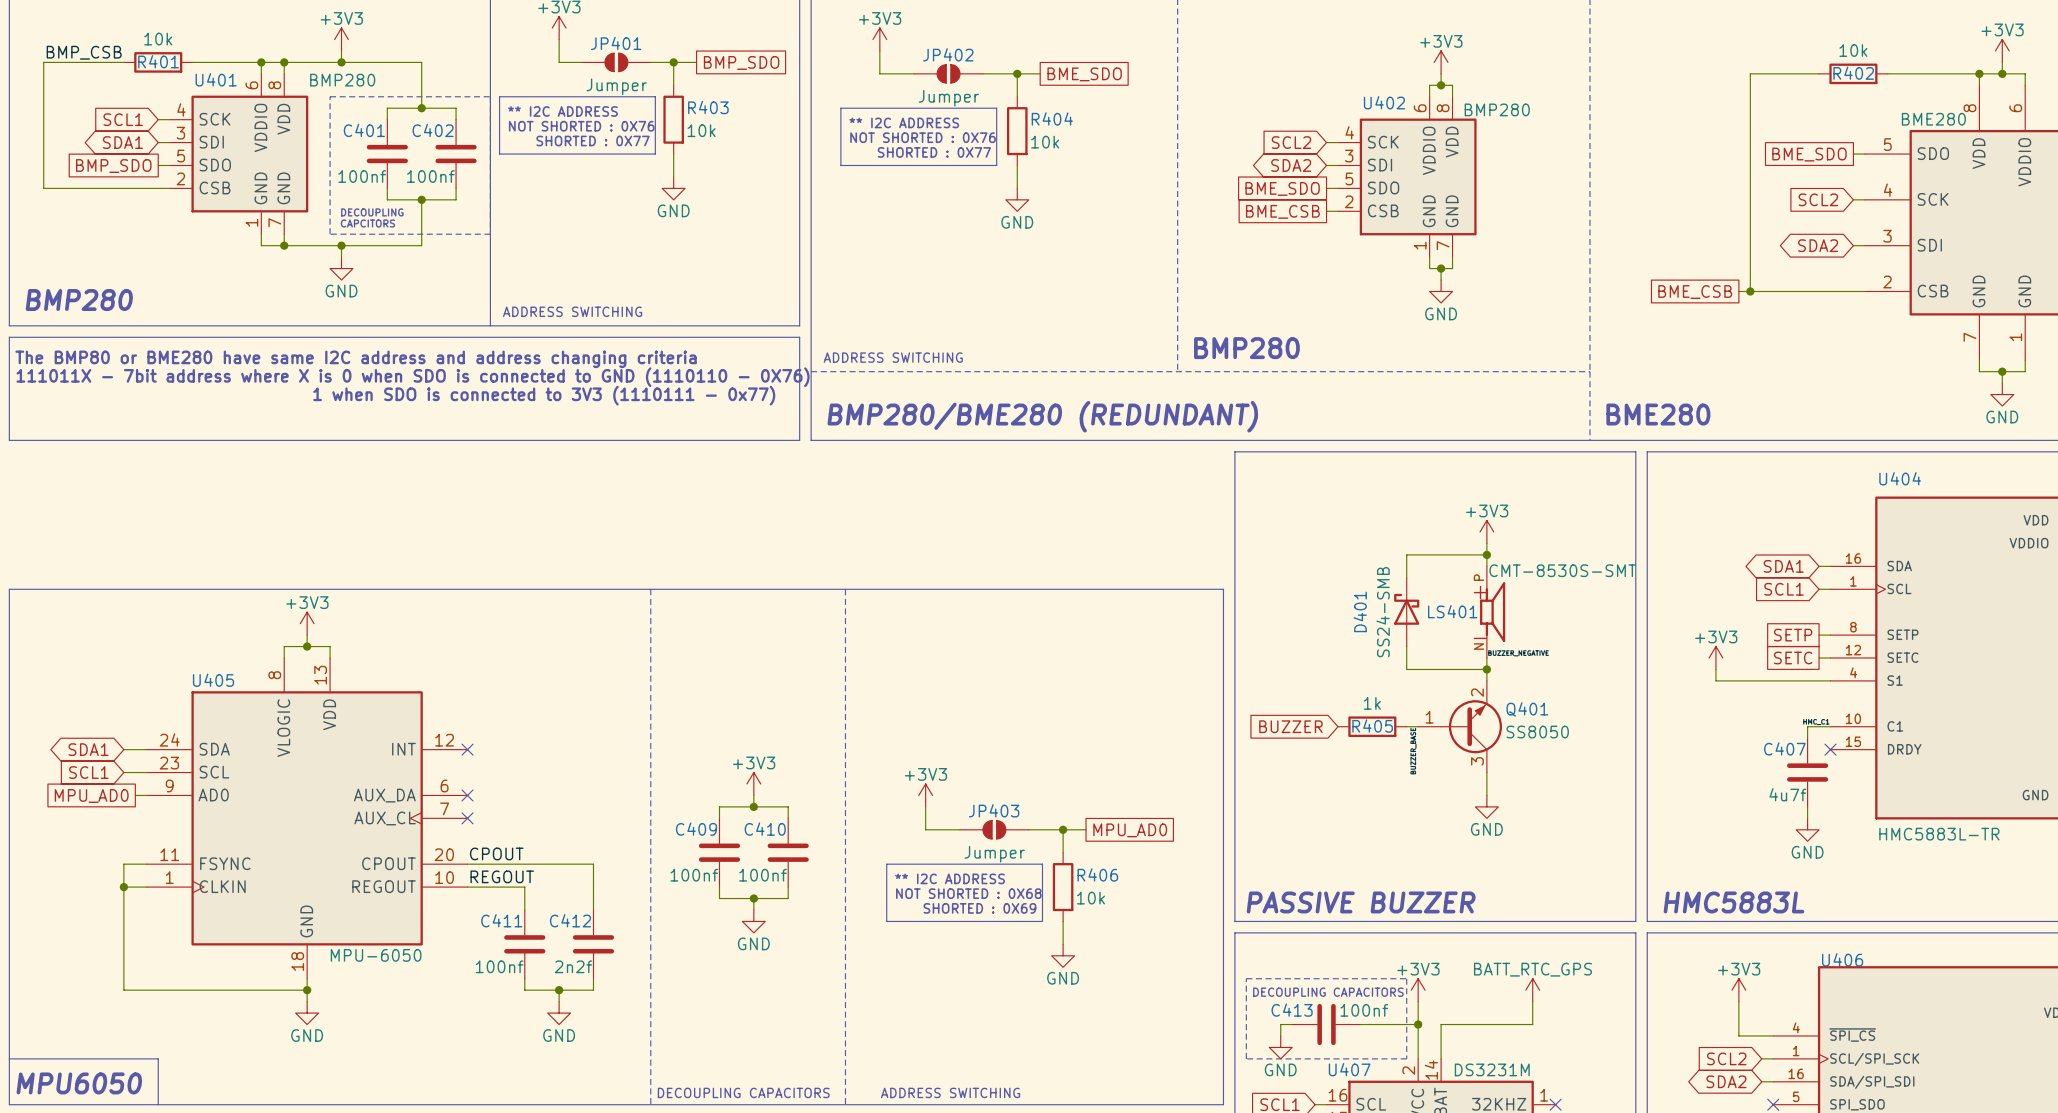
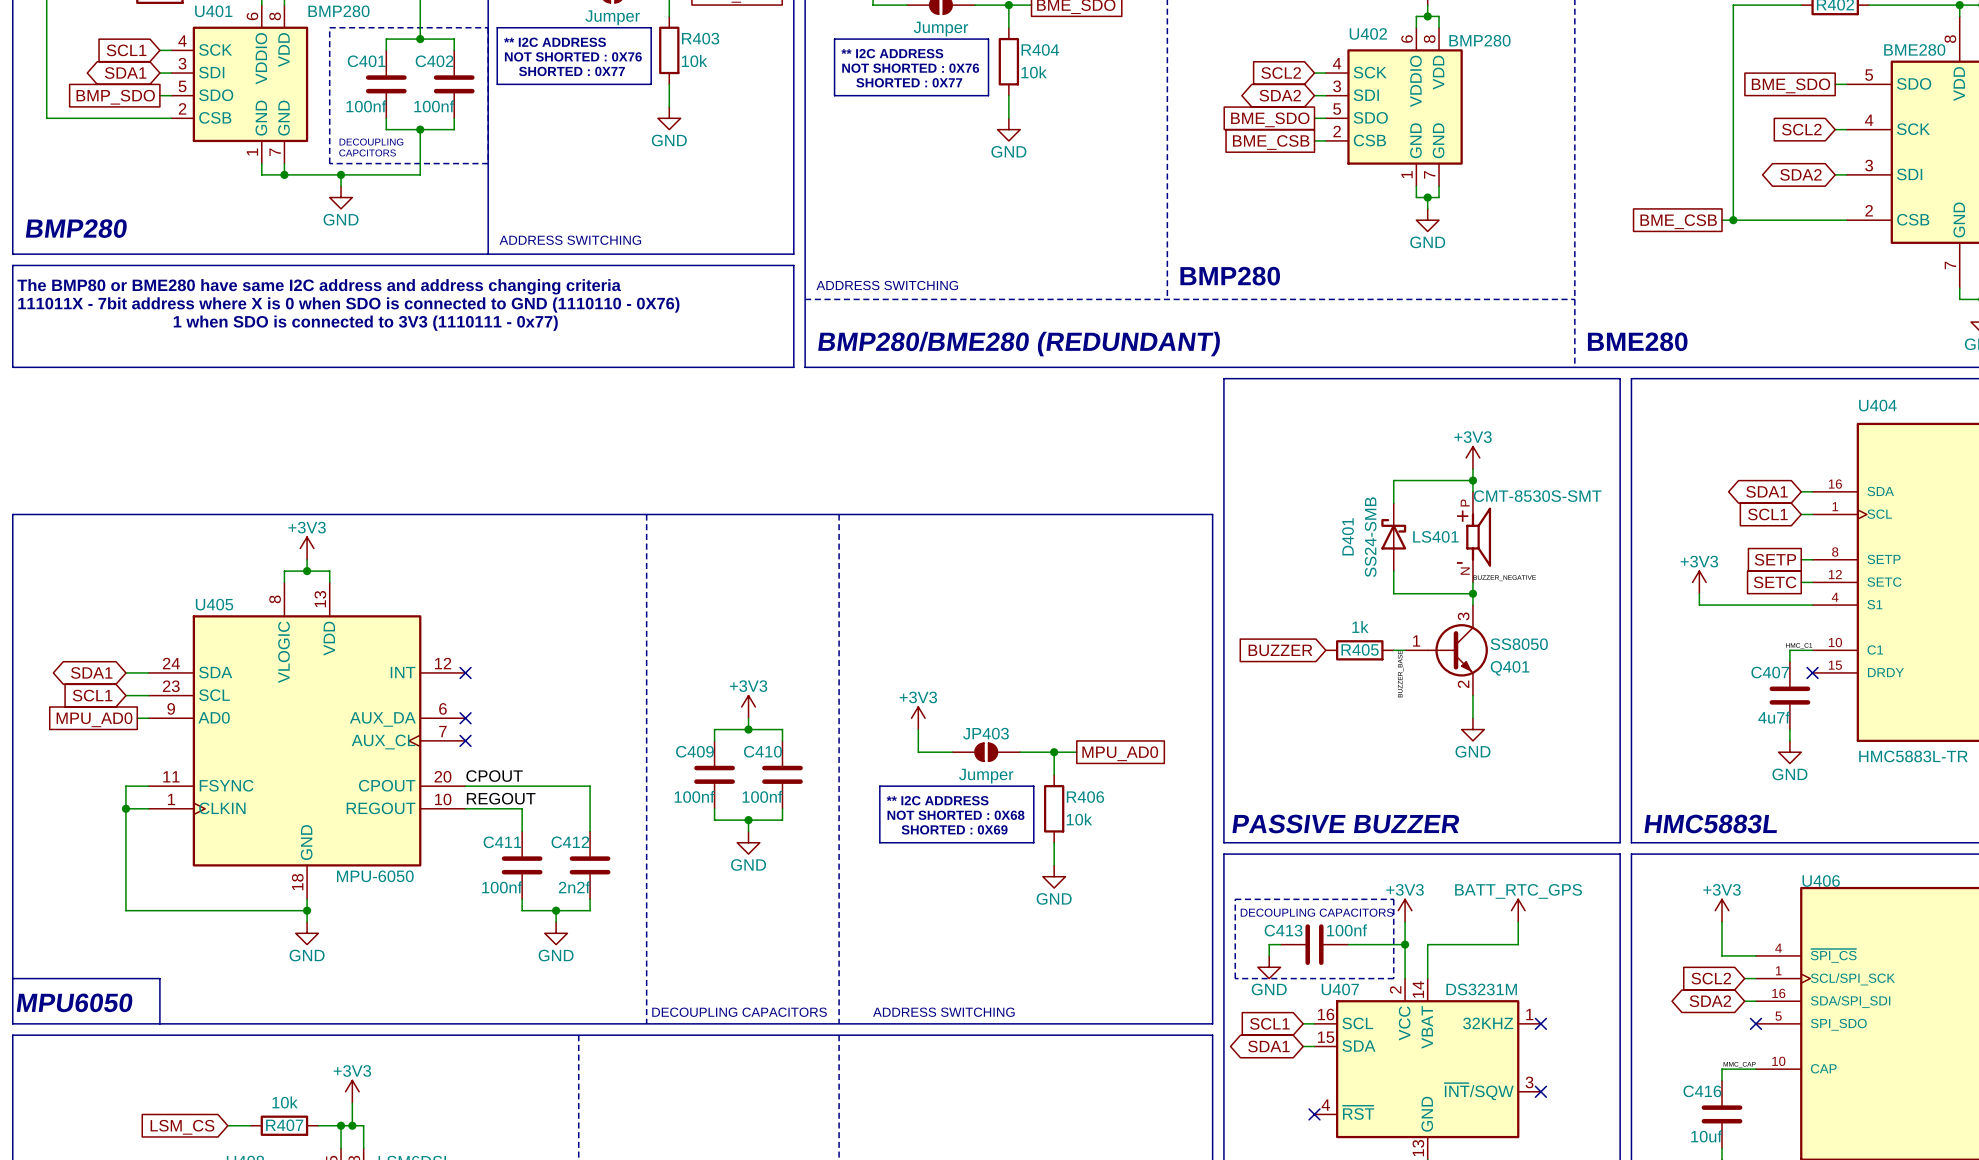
Q401 flip: as is (1471, 726) -> up-down (1457, 650)

